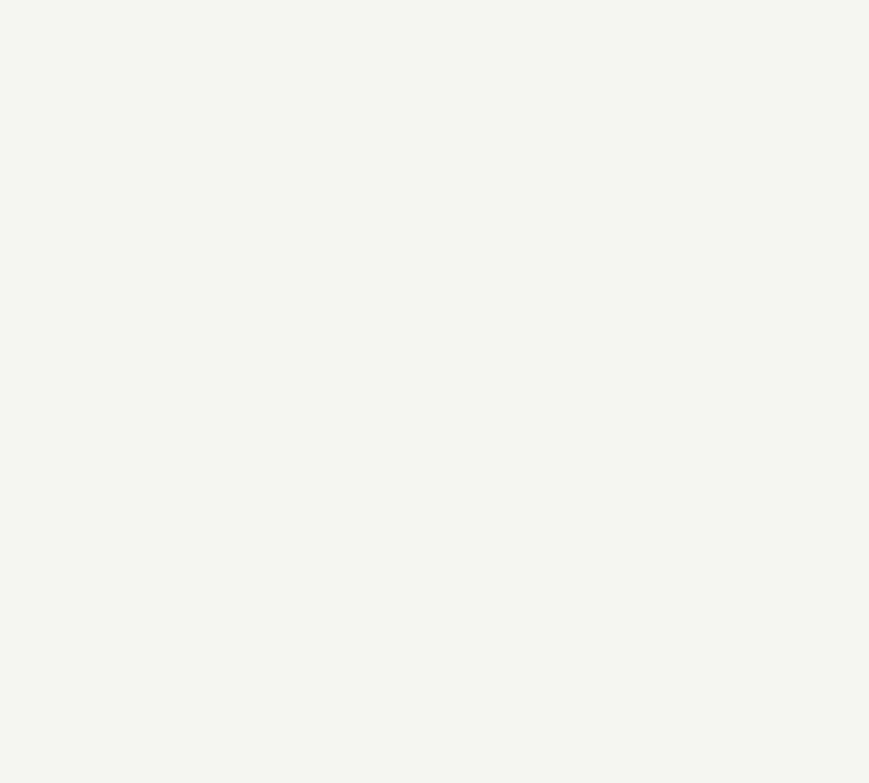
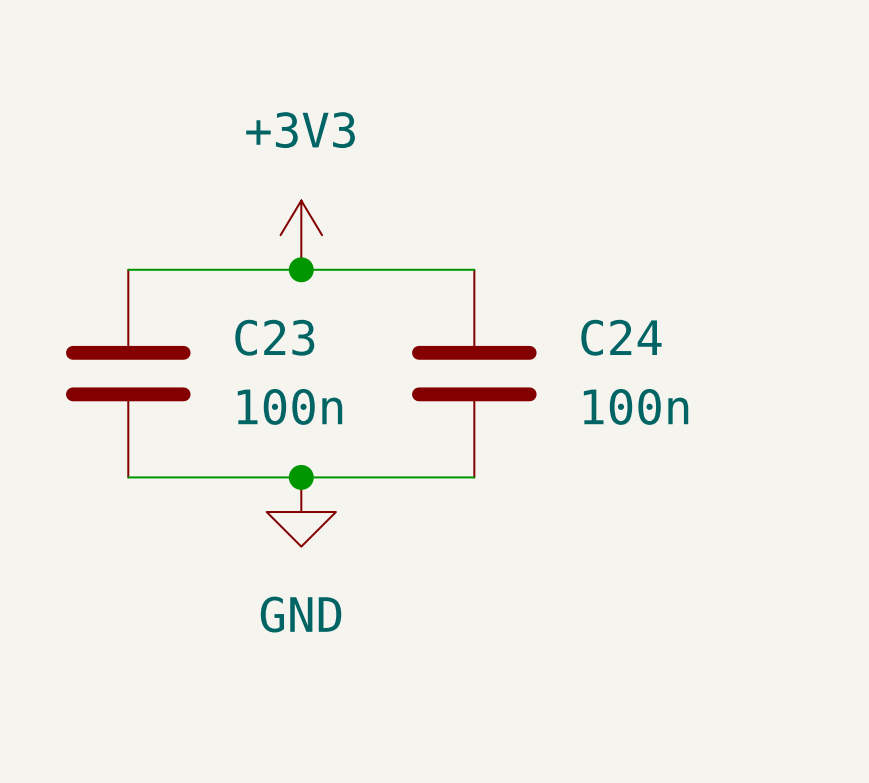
power symbol: none -> +3V3 (301, 235)
wire: none -> (128, 269) (474, 269)
junction: none -> (301, 269)
C23: none -> 100n (128, 373)
C24: none -> 100n (474, 373)
wire: none -> (128, 477) (474, 477)
junction: none -> (301, 477)
power symbol: none -> GND (301, 512)

